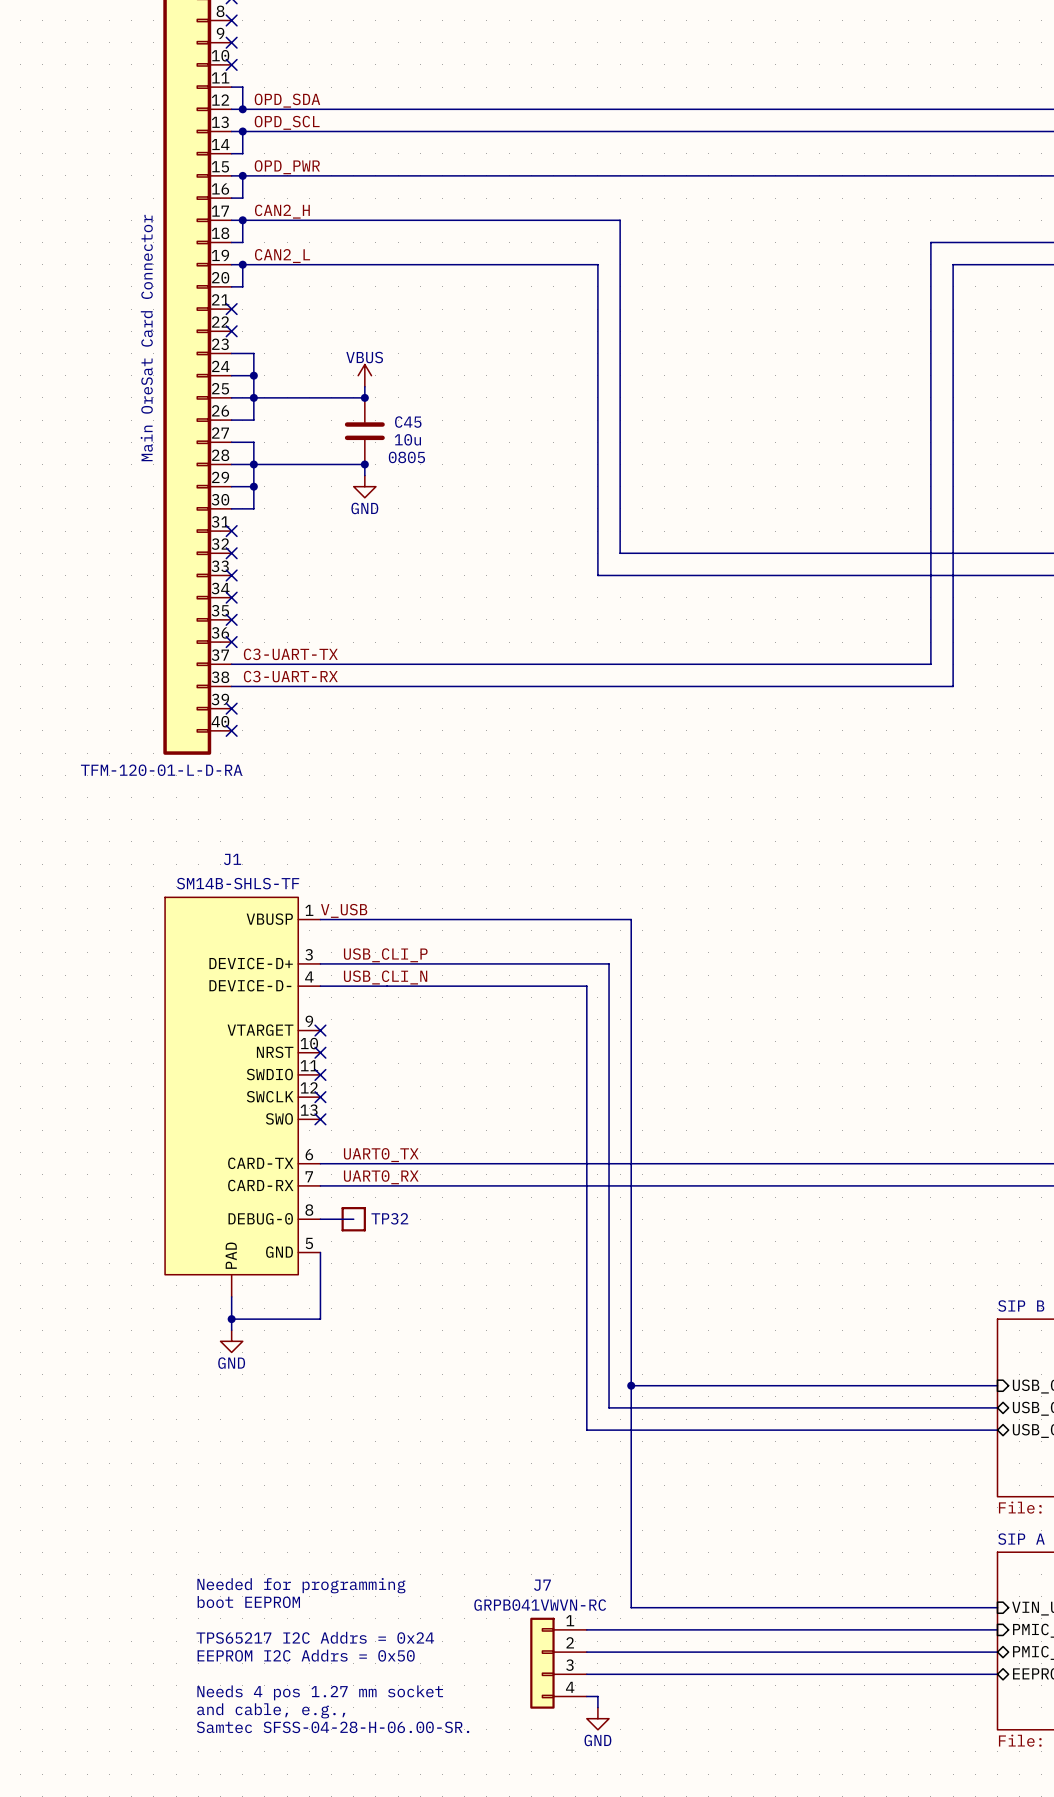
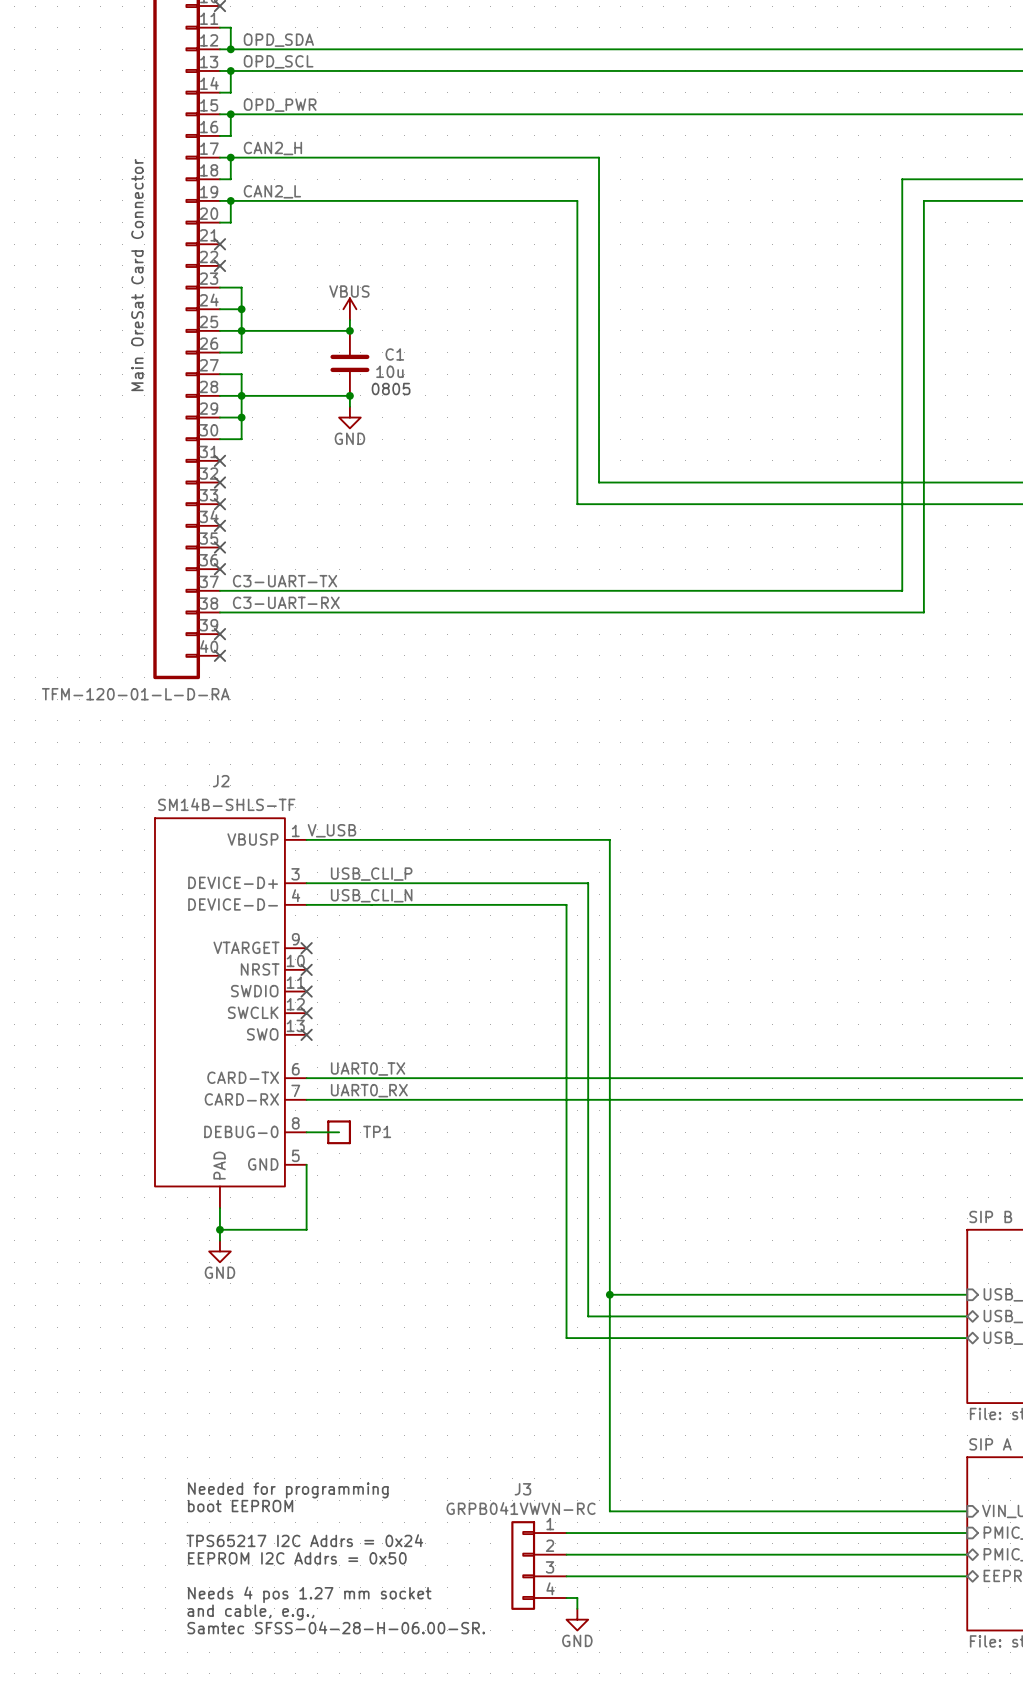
C45 name: C45 (408, 422) -> C1 (394, 354)
J1 name: J1 (232, 859) -> J2 (221, 781)
TP32 name: TP32 (389, 1218) -> TP1 (377, 1131)
J7 name: J7 (542, 1585) -> J3 (522, 1489)

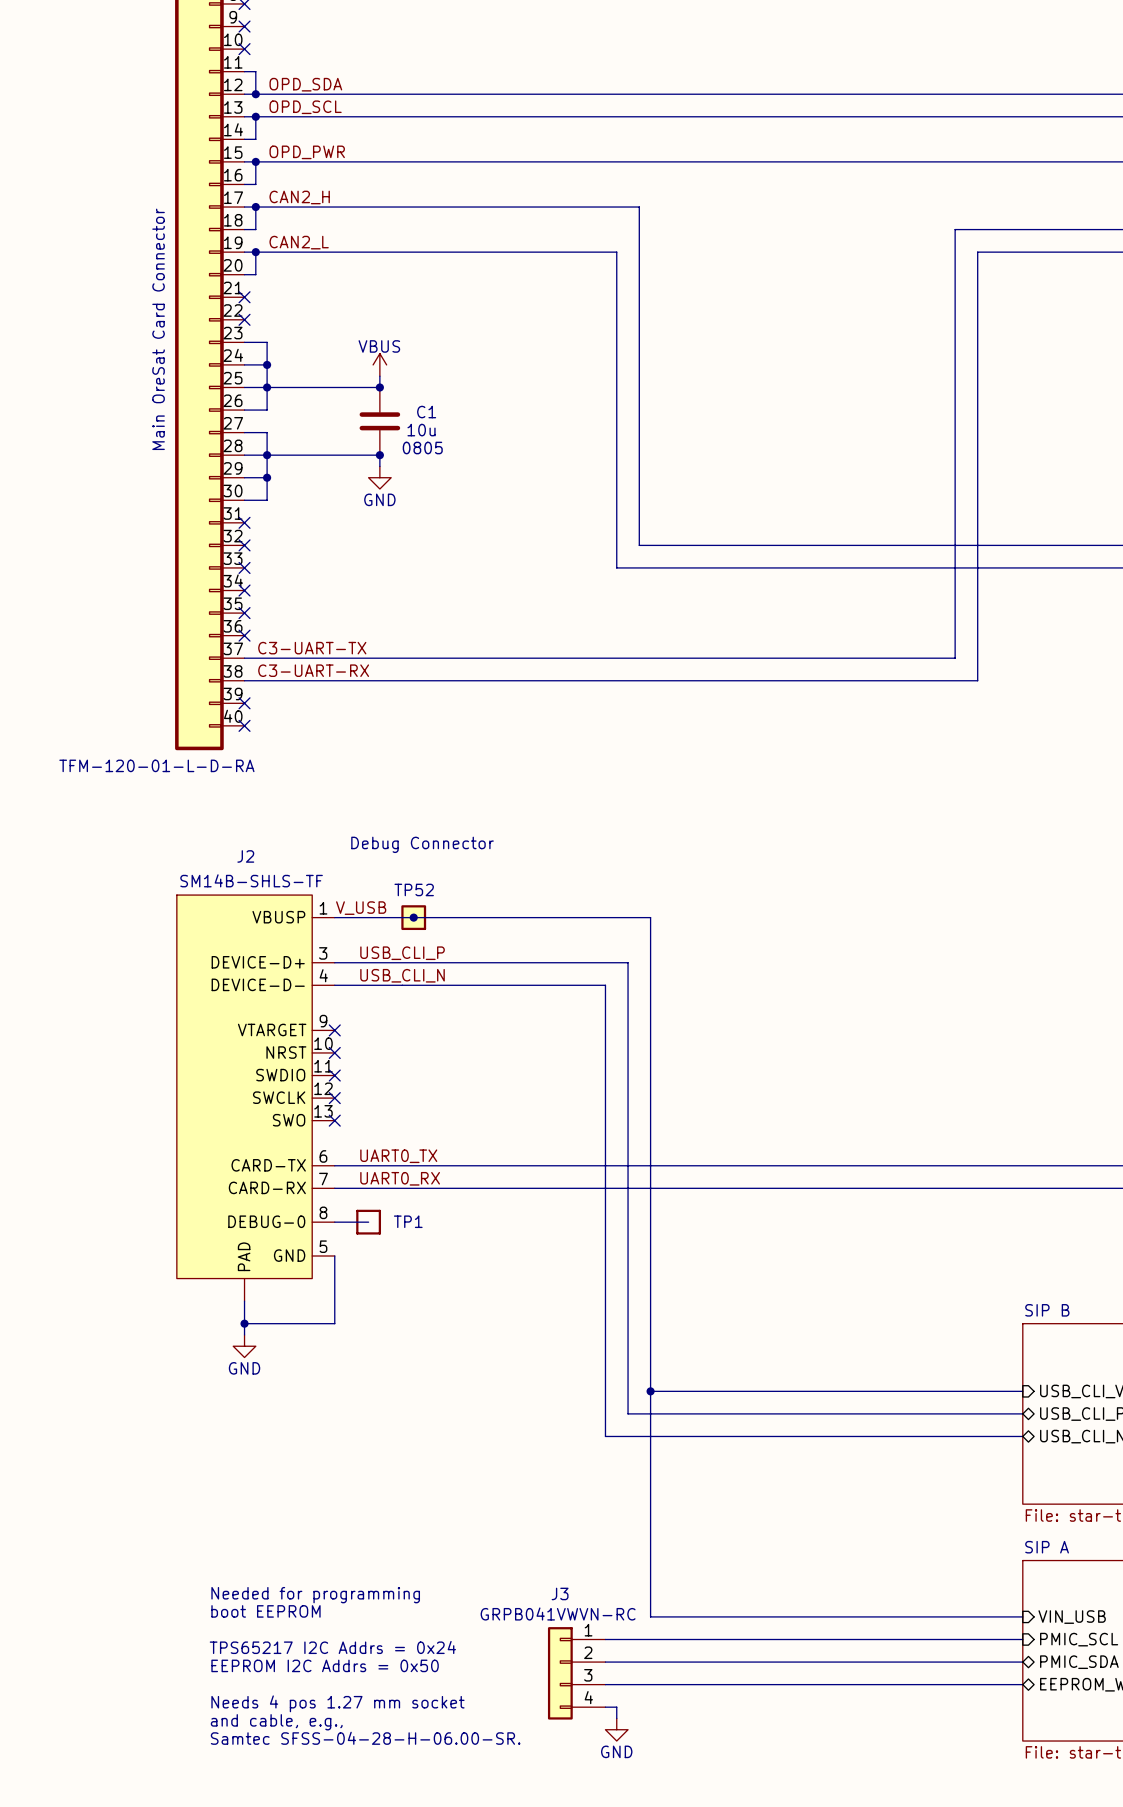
text: none -> Debug Connector (422, 844)
junction: none -> (413, 917)
TP52: none -> (413, 917)

